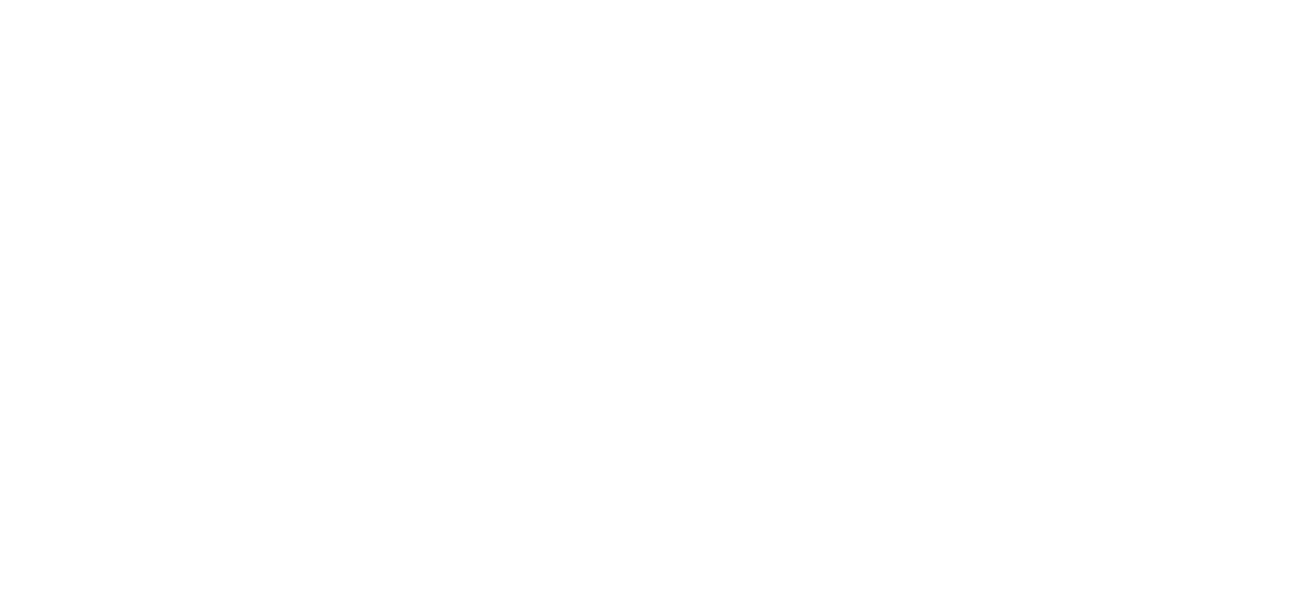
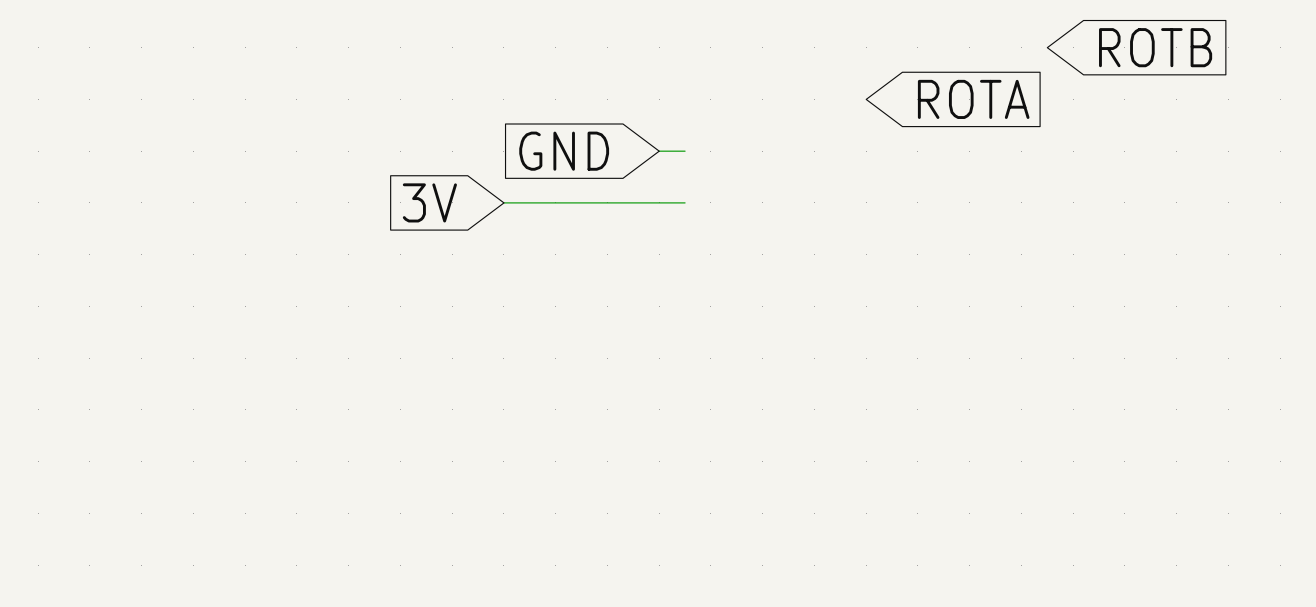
global label: none -> ROTB (1155, 47)
global label: none -> ROTA (973, 99)
global label: none -> GND (564, 151)
wire: none -> (659, 151) (685, 151)
global label: none -> 3V (429, 202)
wire: none -> (503, 202) (685, 202)

